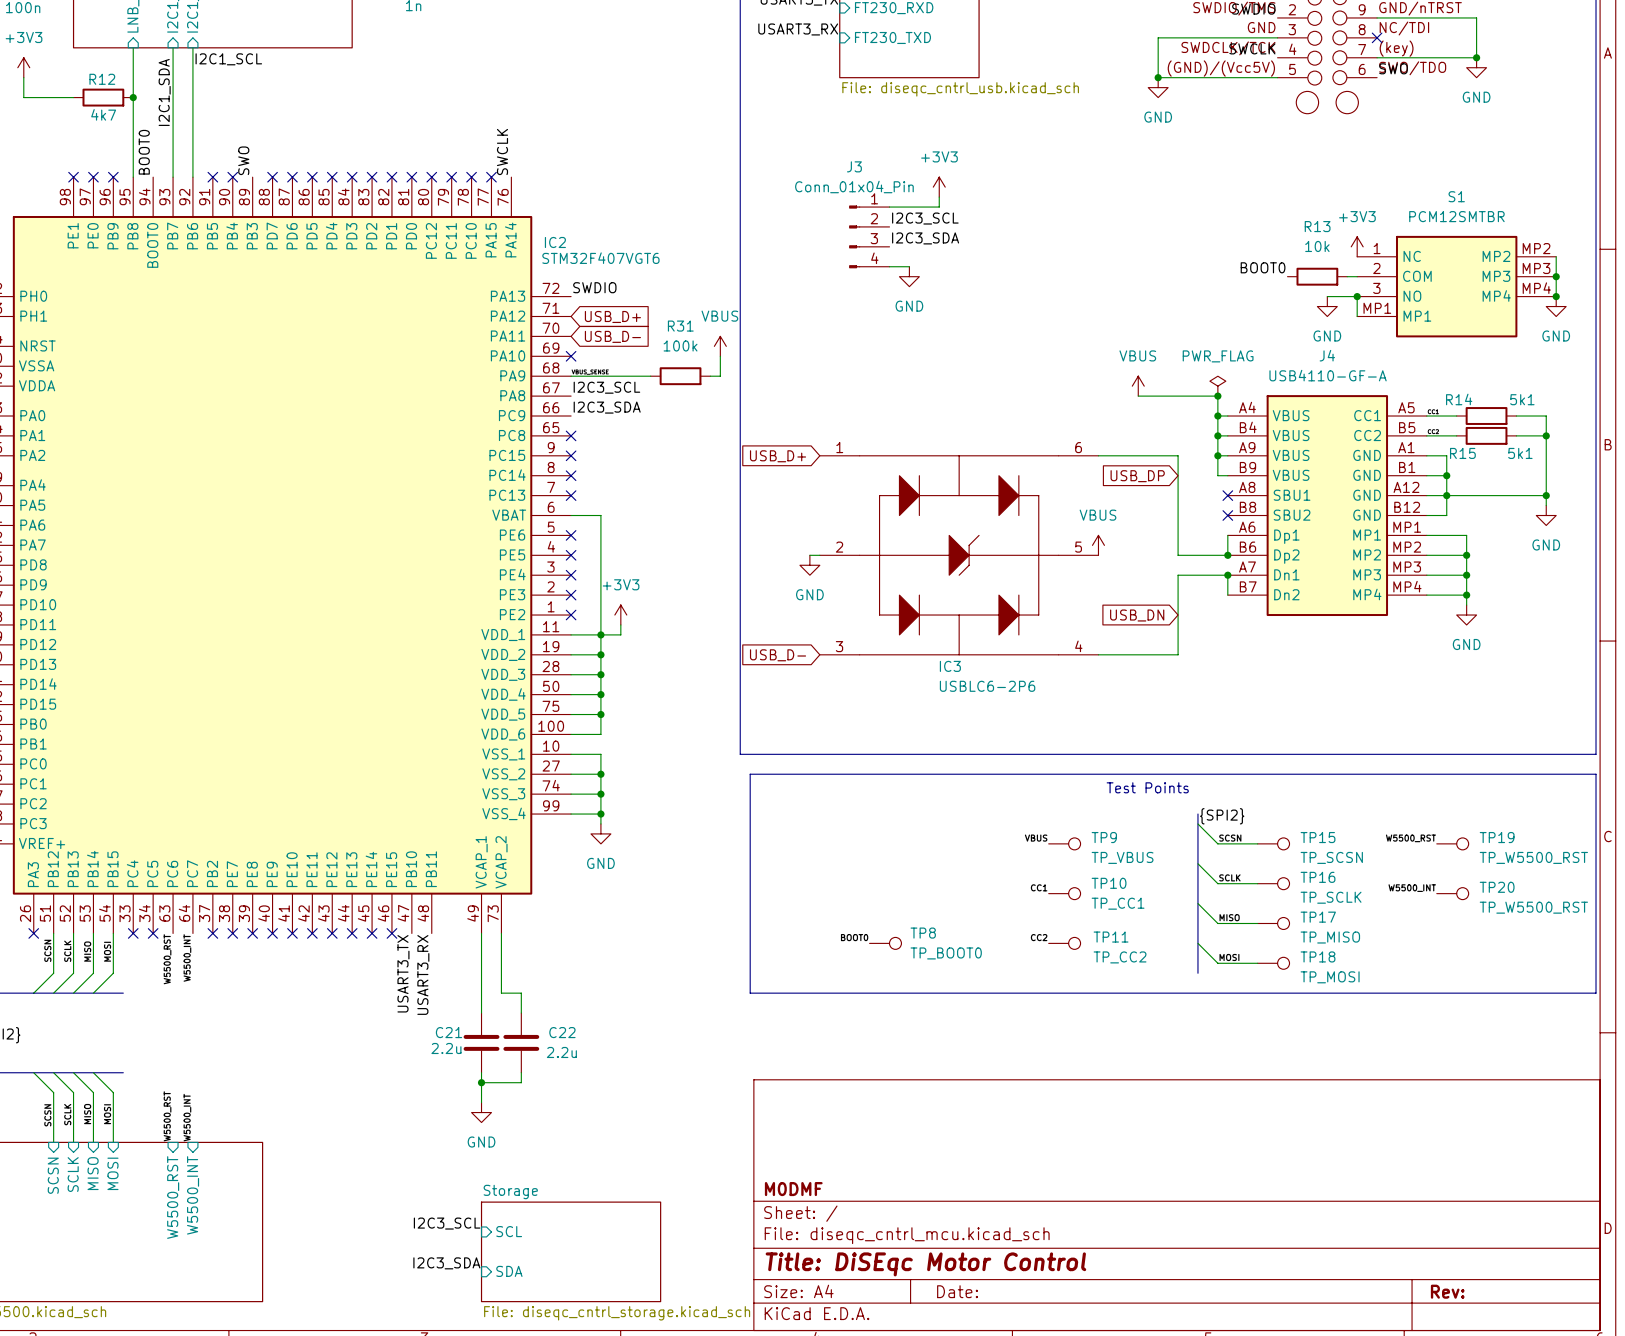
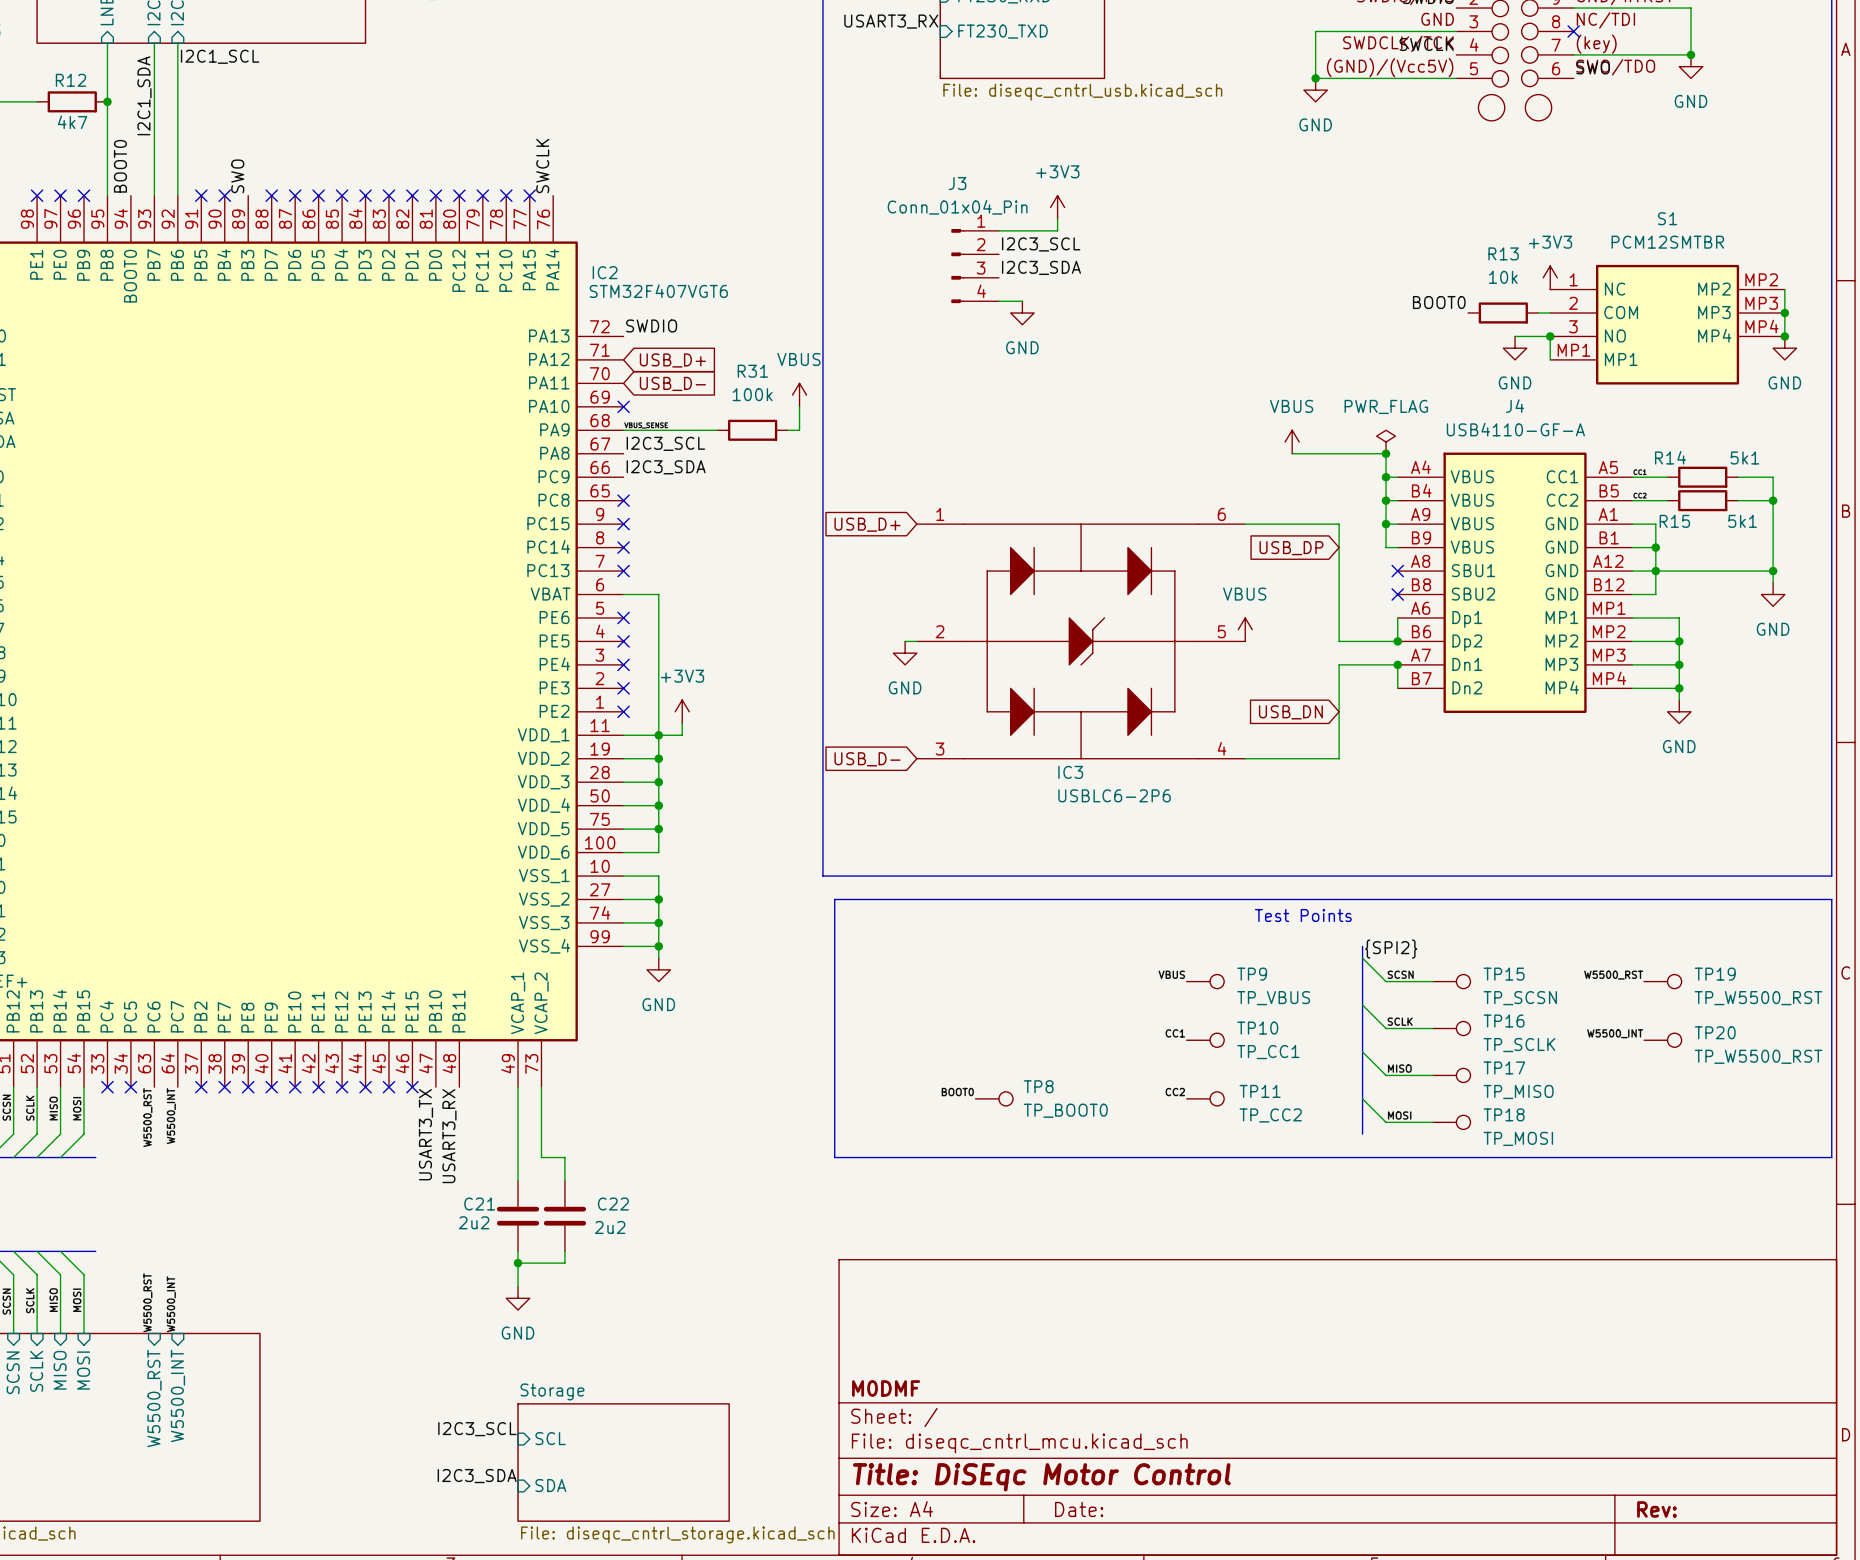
C21 value: 2.2u (446, 1048) -> 2u2 (474, 1222)
C22 value: 2.2u (561, 1052) -> 2u2 (610, 1227)

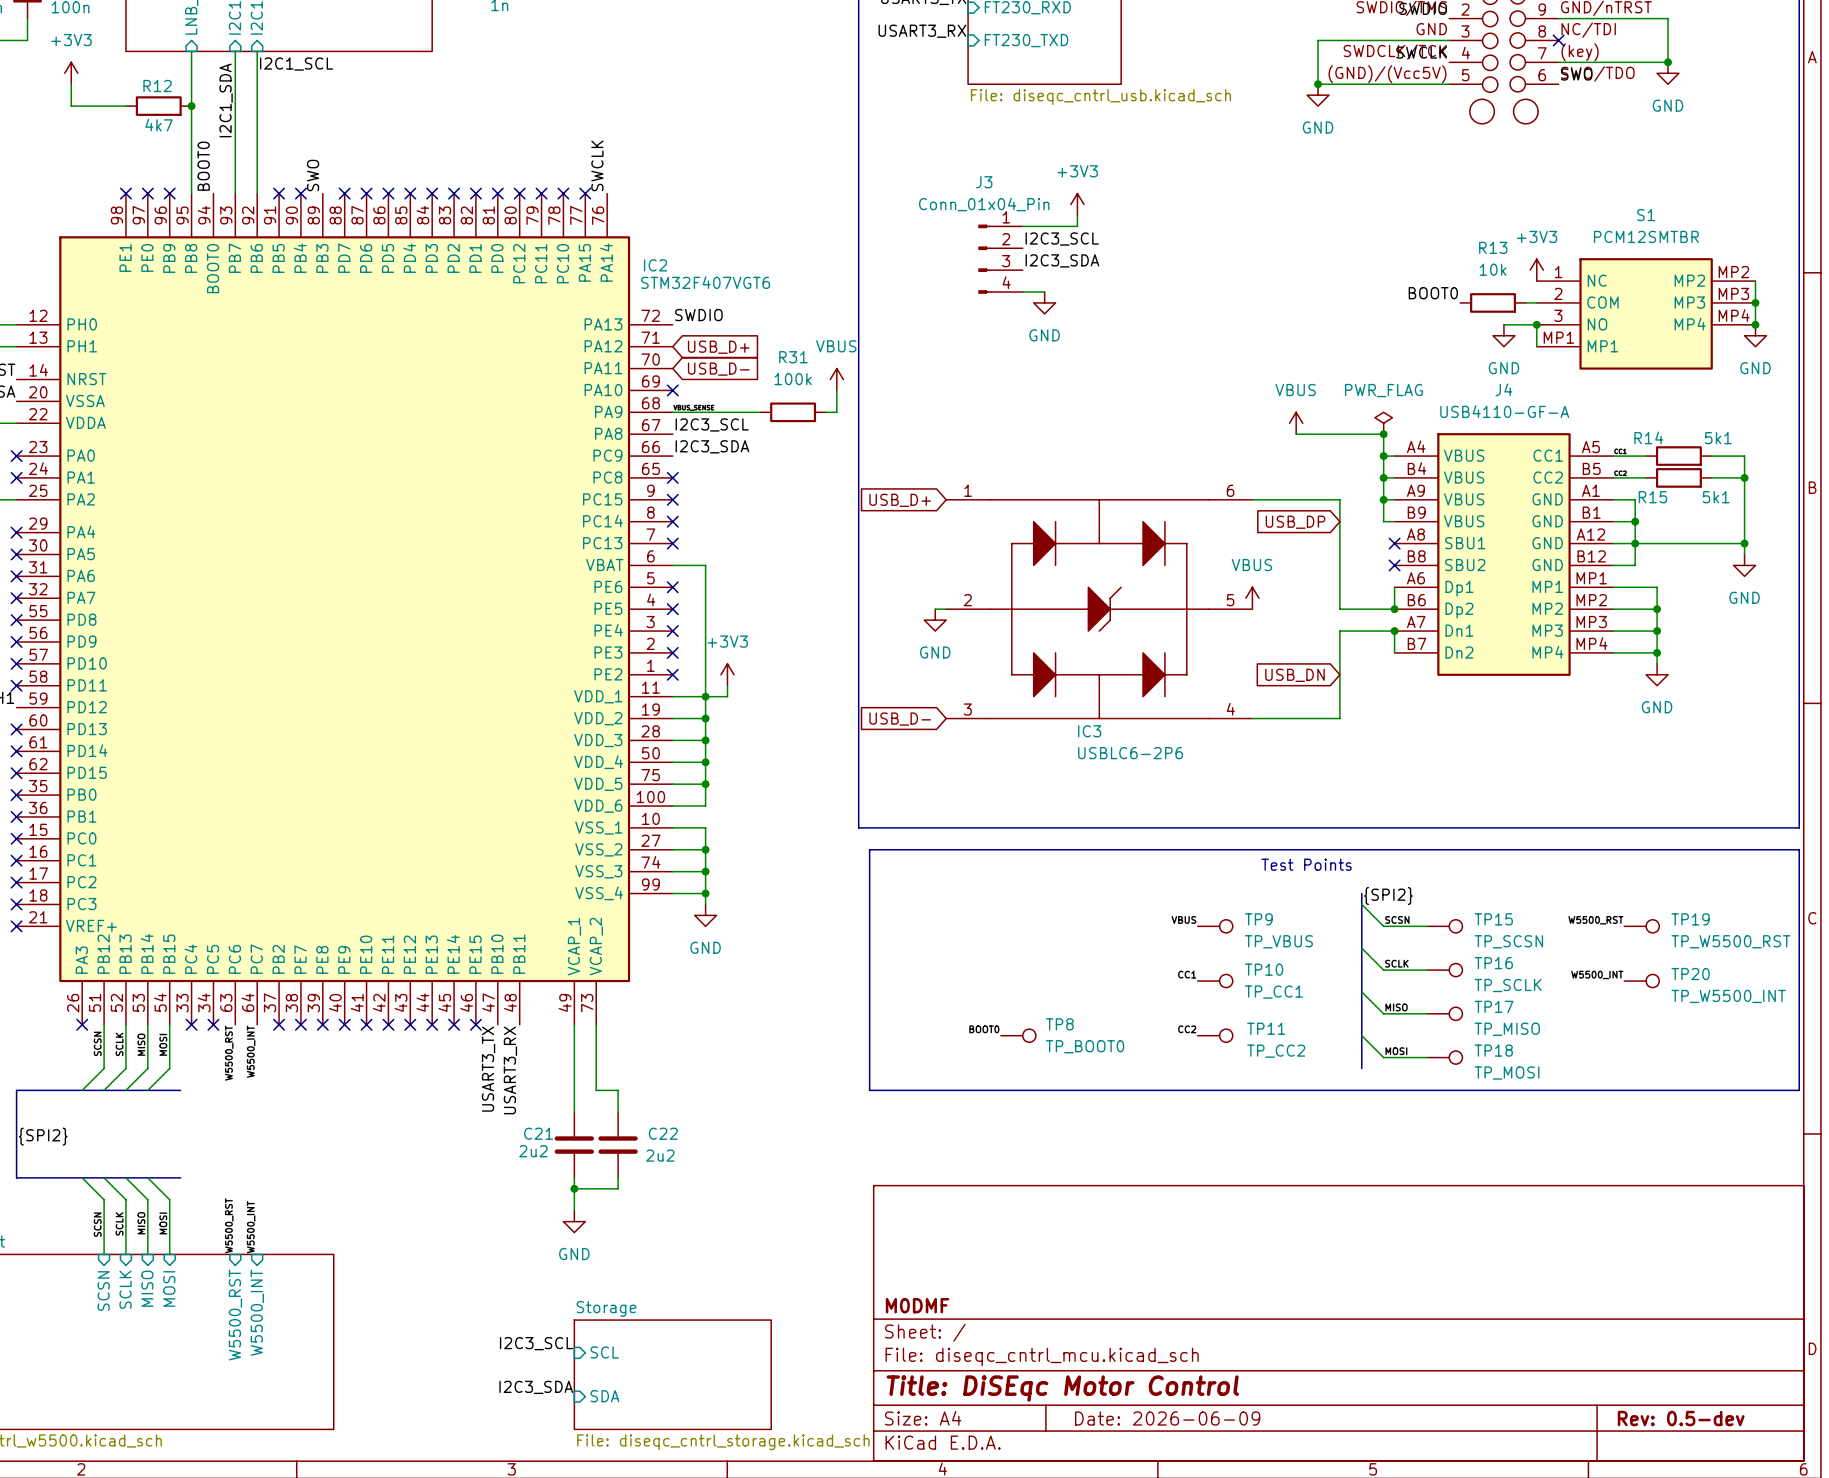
TP20 value: TP_W5500_RST (1758, 1056) -> TP_W5500_INT (1728, 996)
title block: Date: (1079, 1509) -> Date: 2026-06-09 (1167, 1418)
title block: Rev: (1656, 1509) -> Rev: 0.5-dev (1681, 1418)

